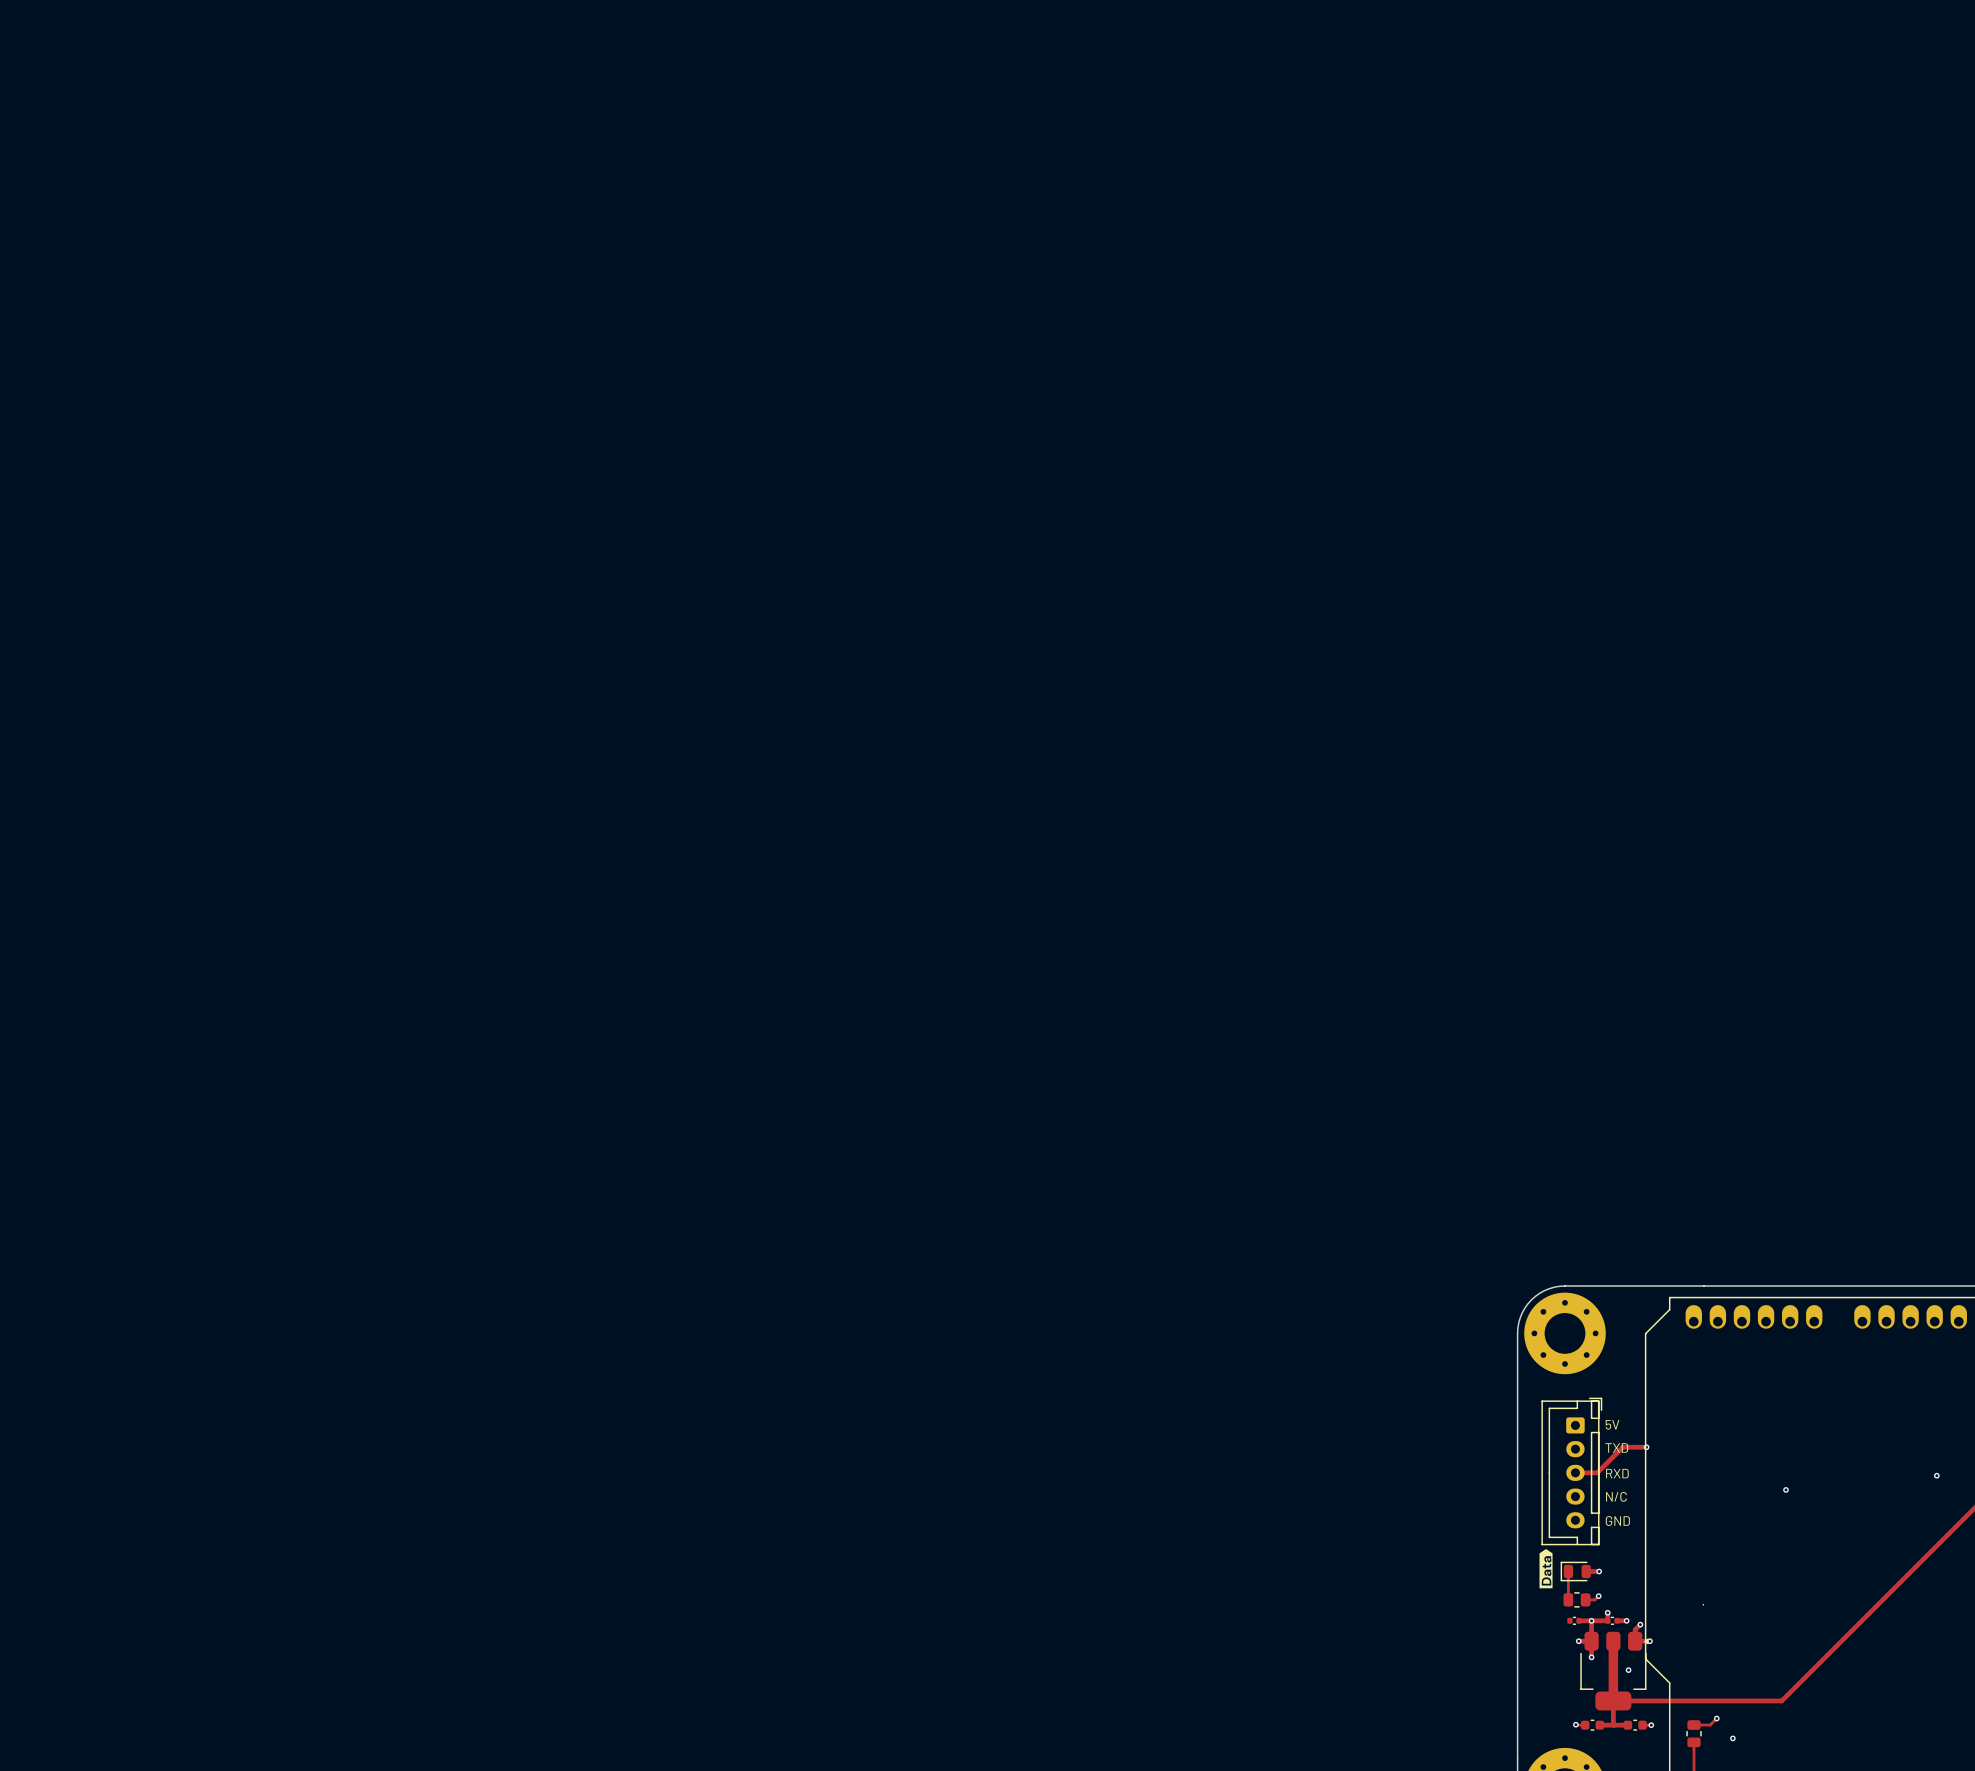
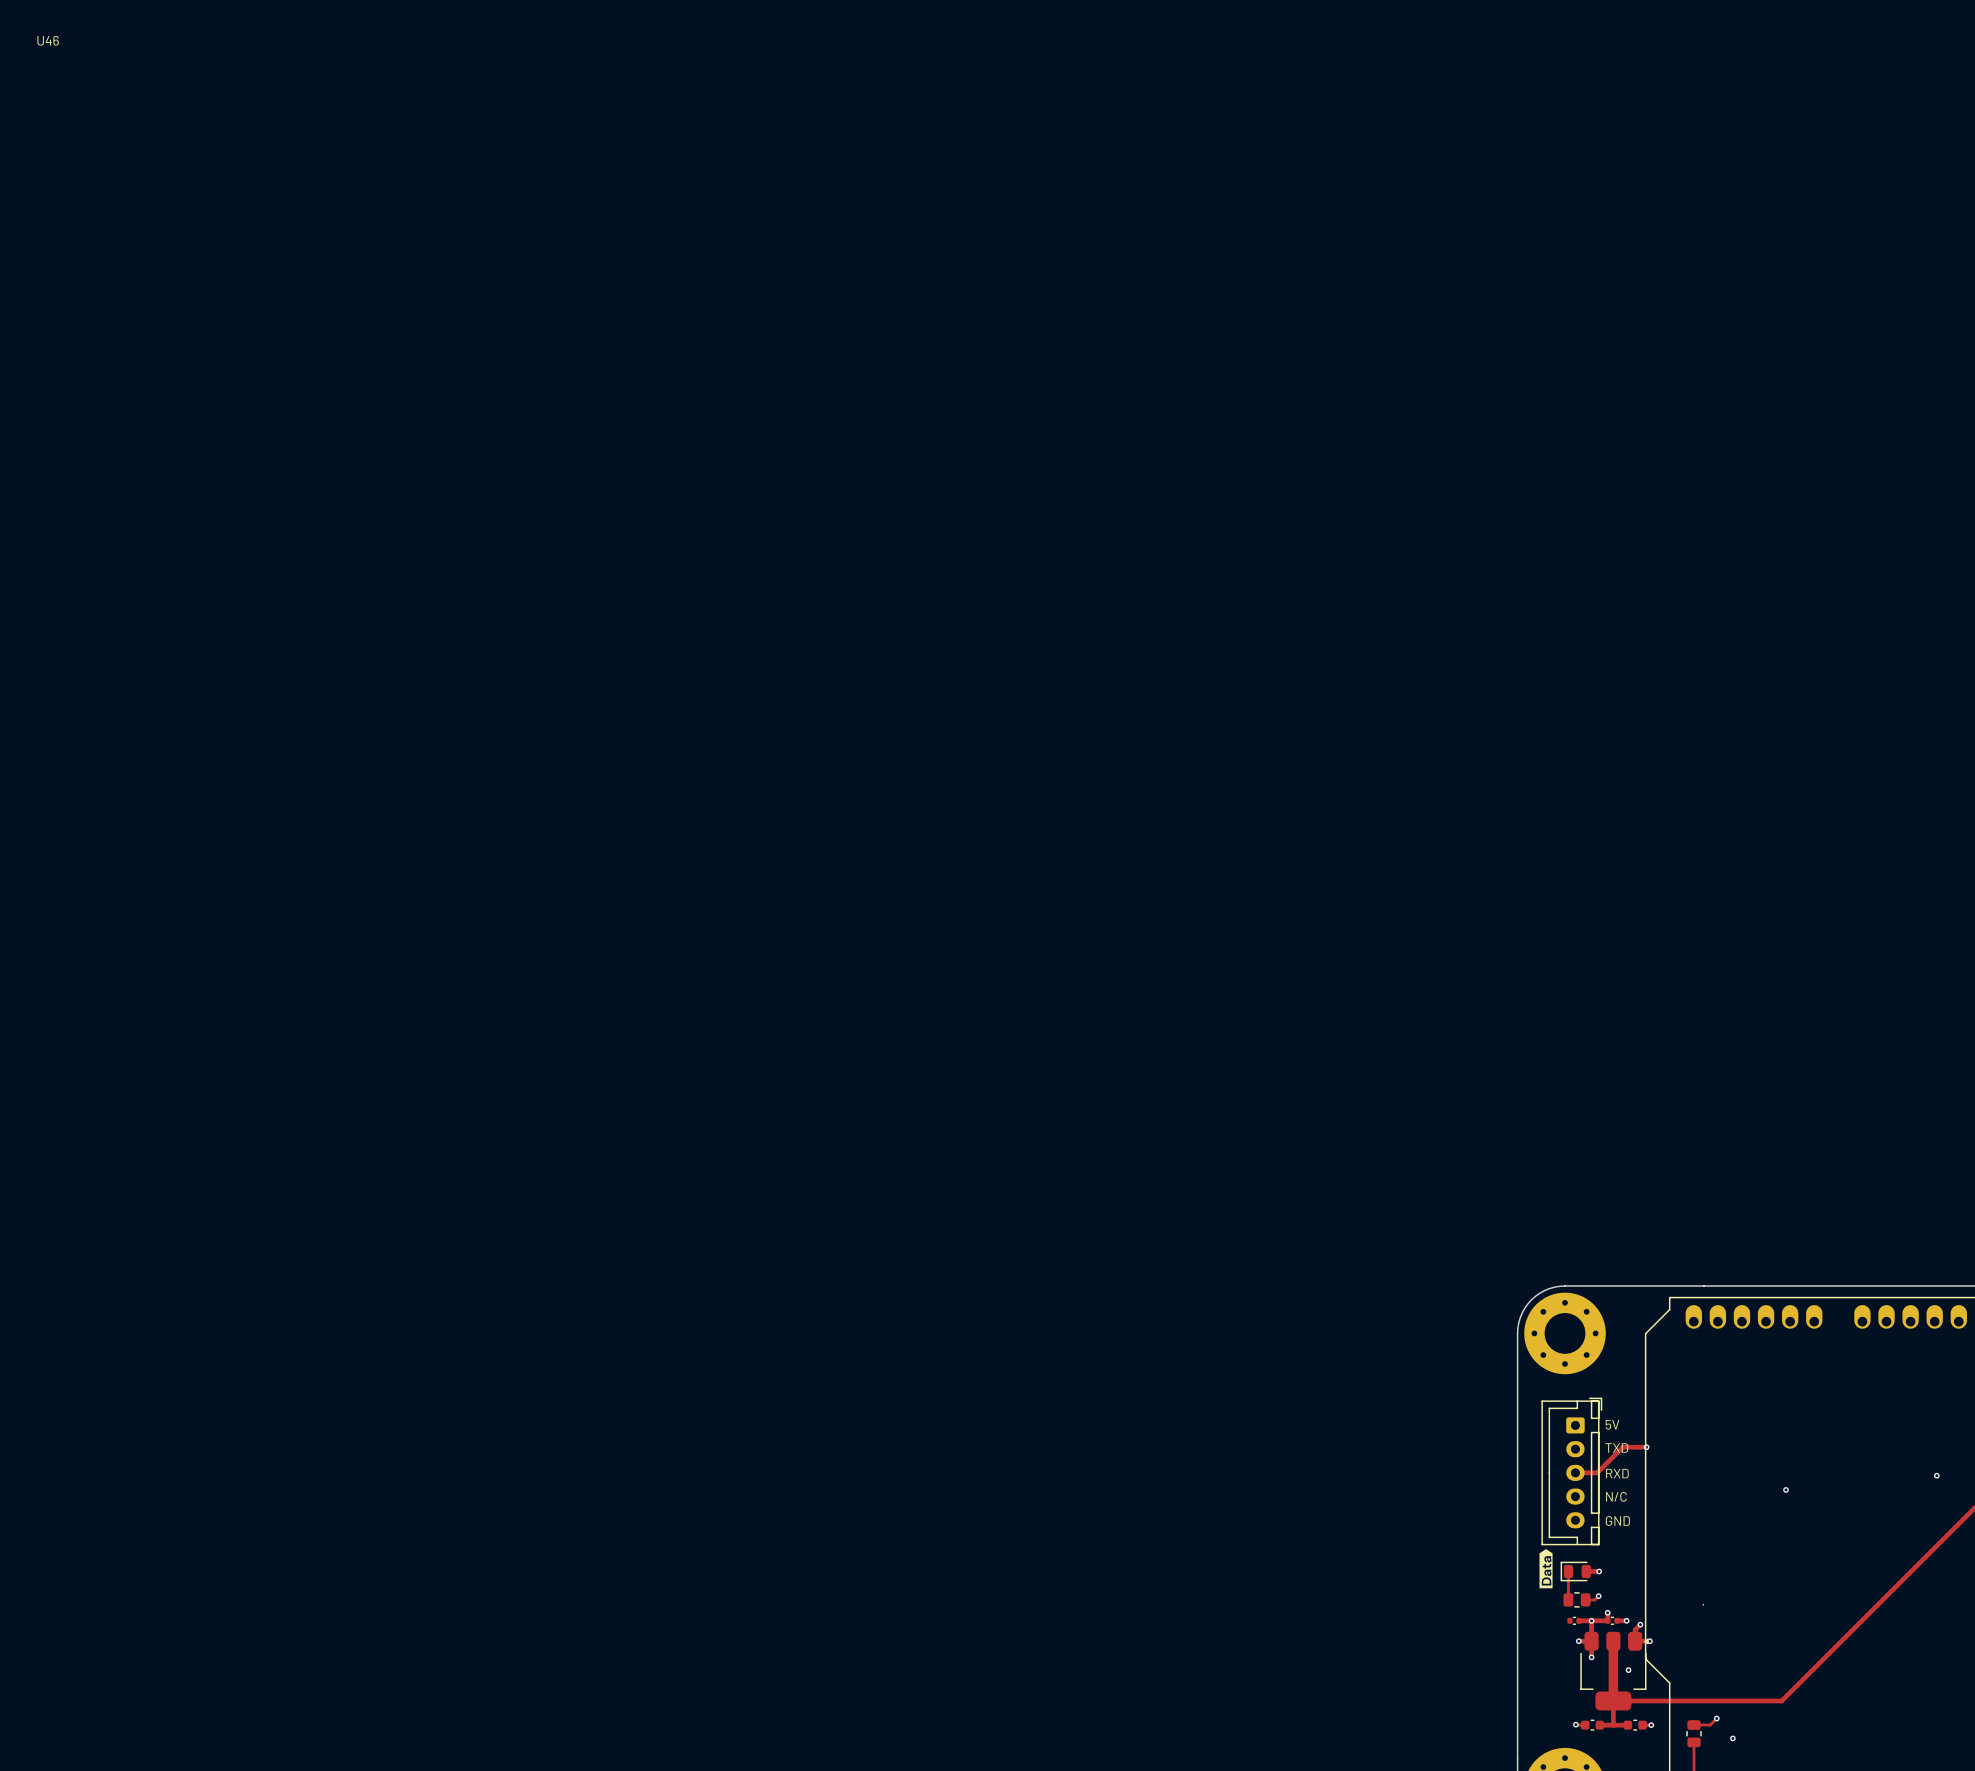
U46: none -> (48, 40)

